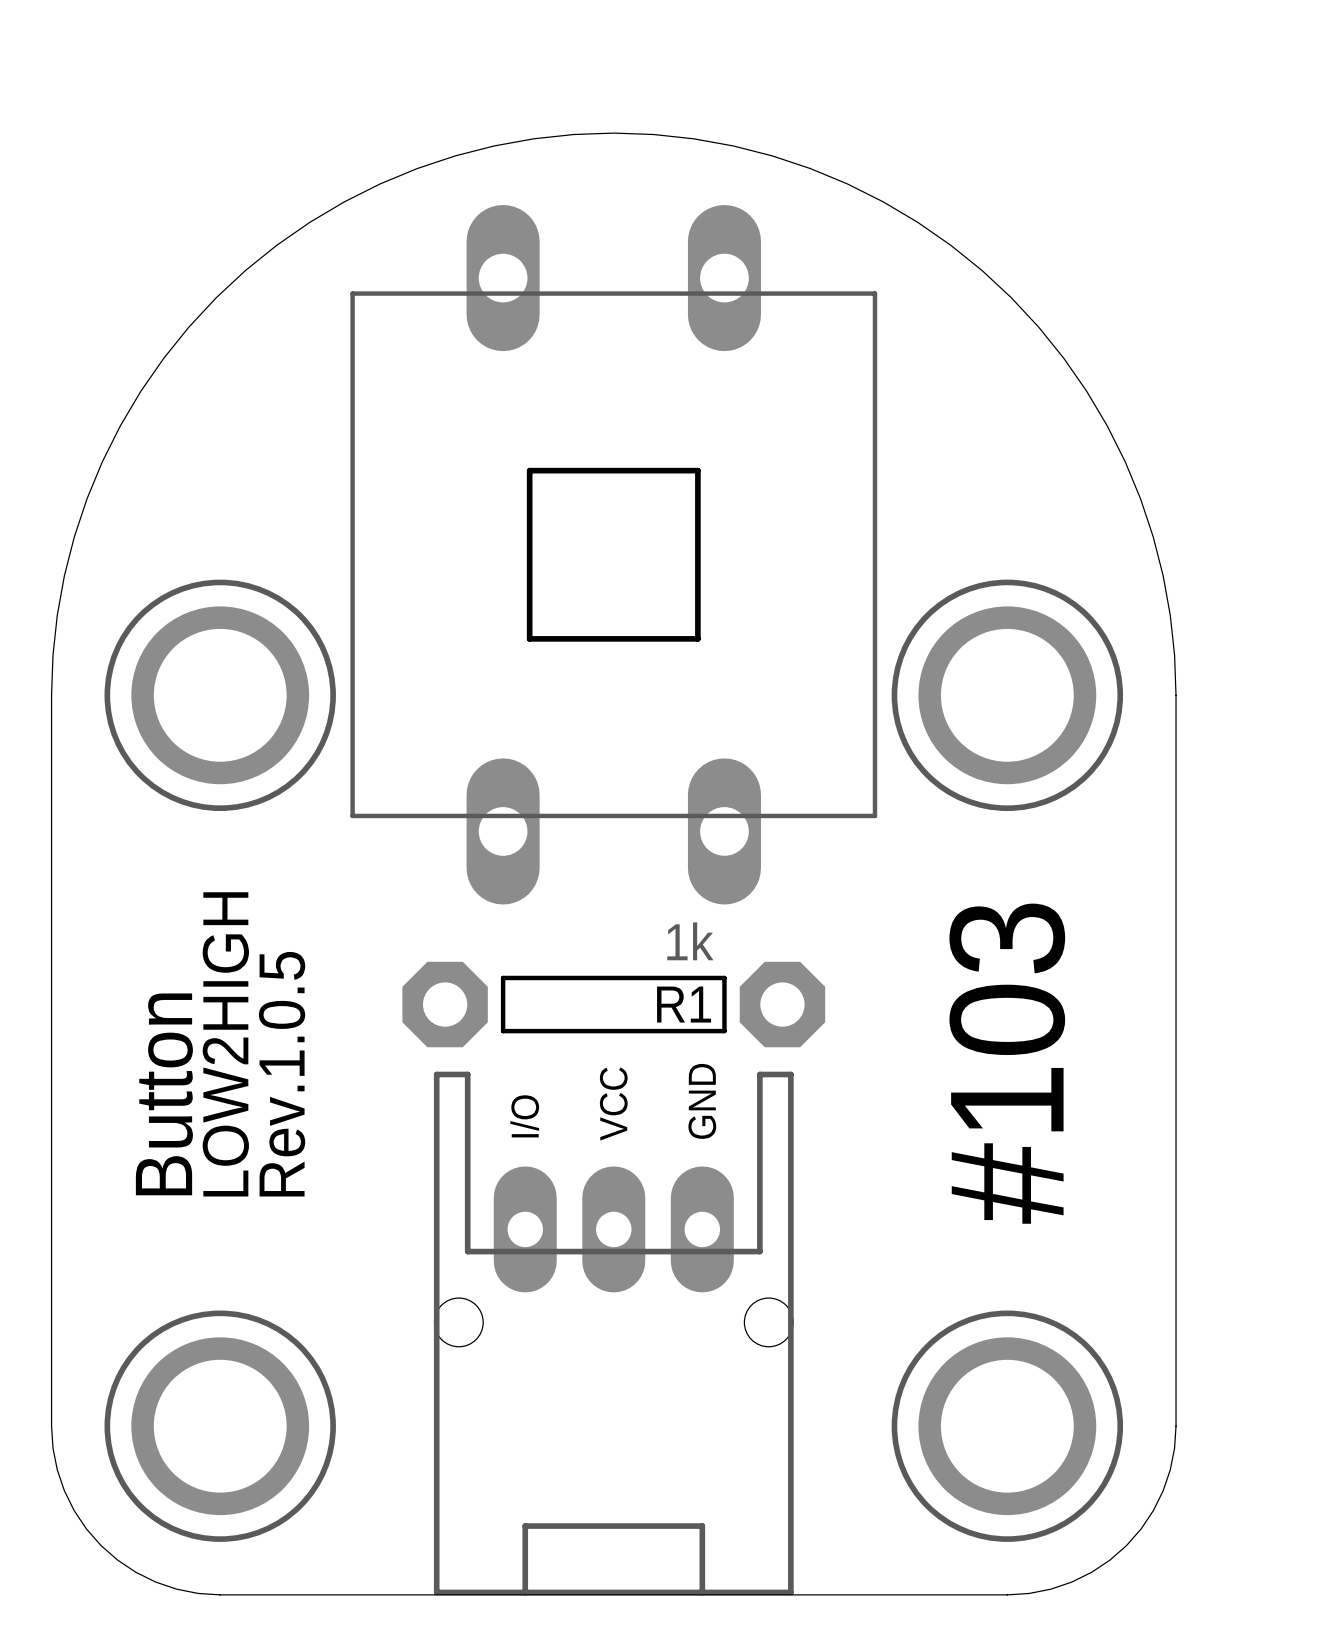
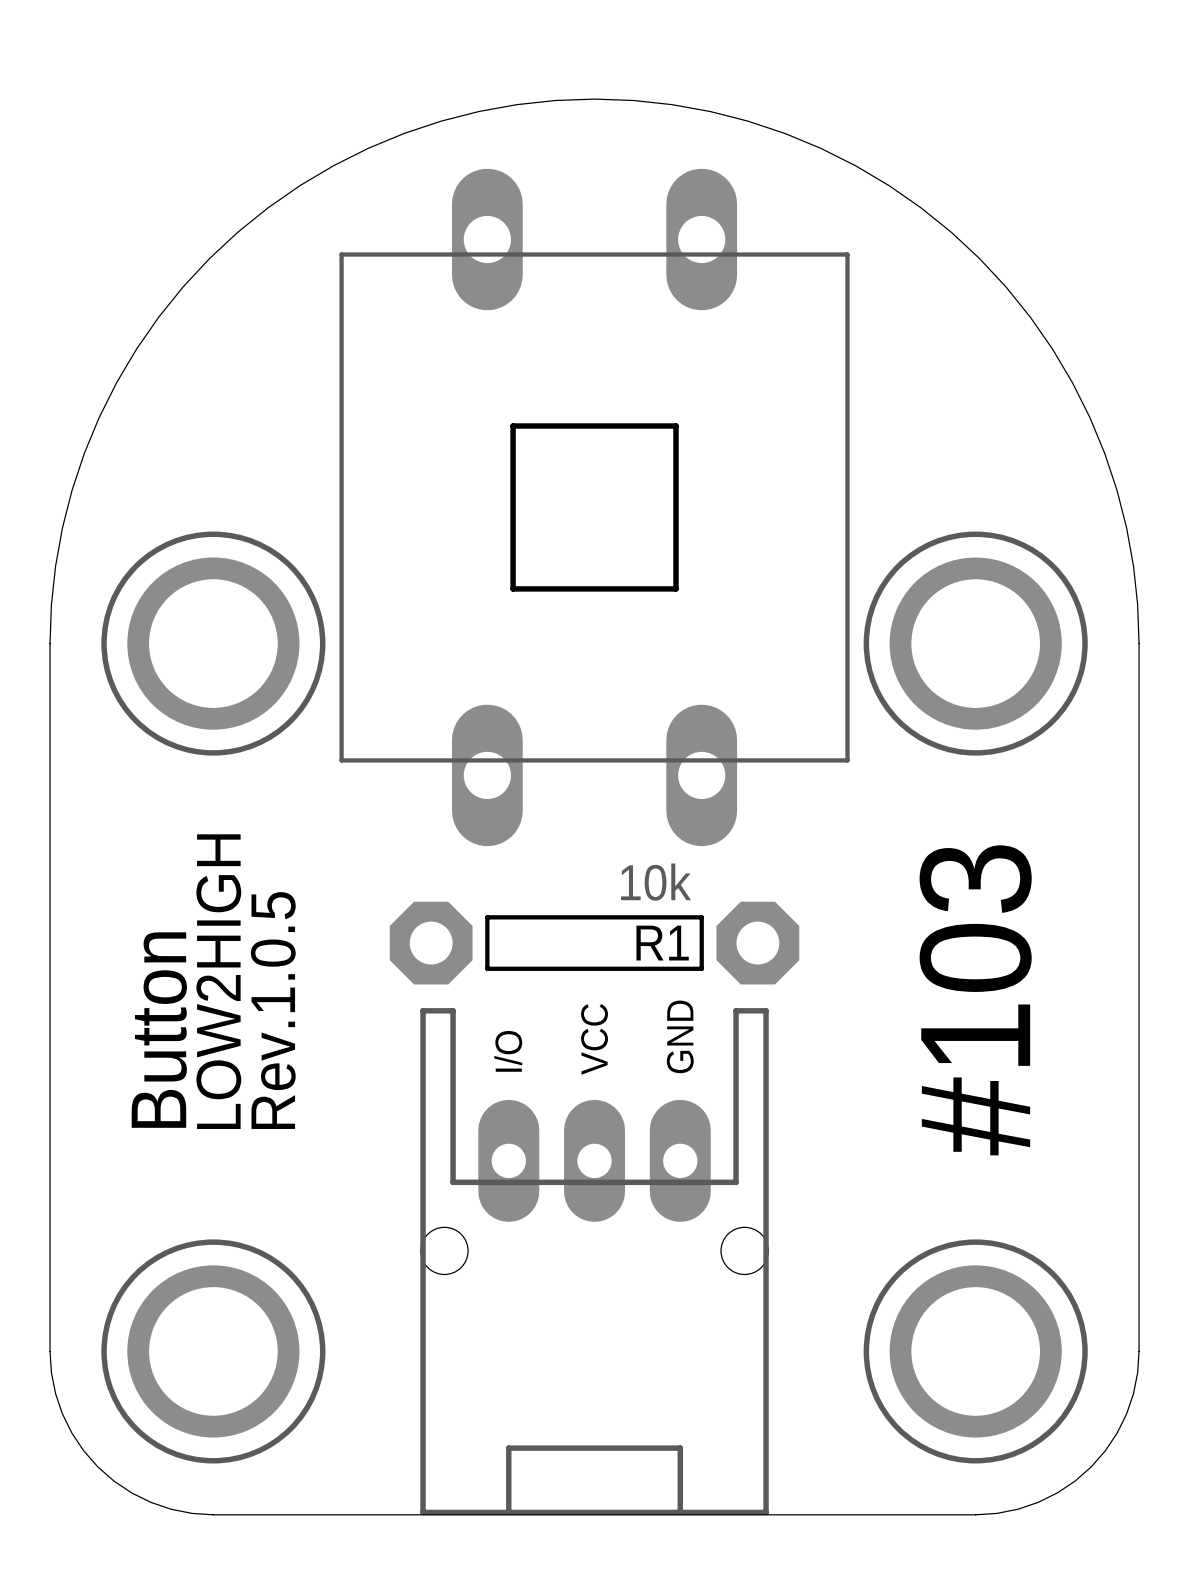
R1 value: 1k (690, 941) -> 10k (656, 882)

